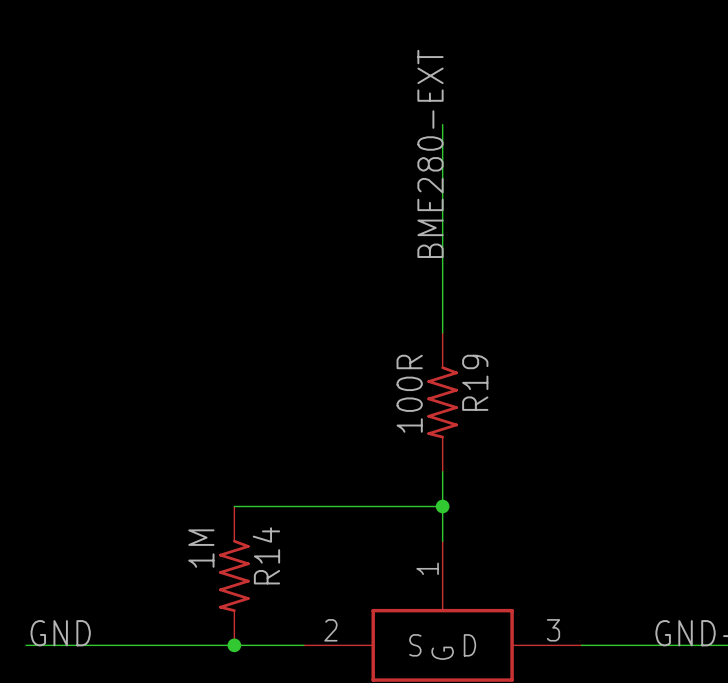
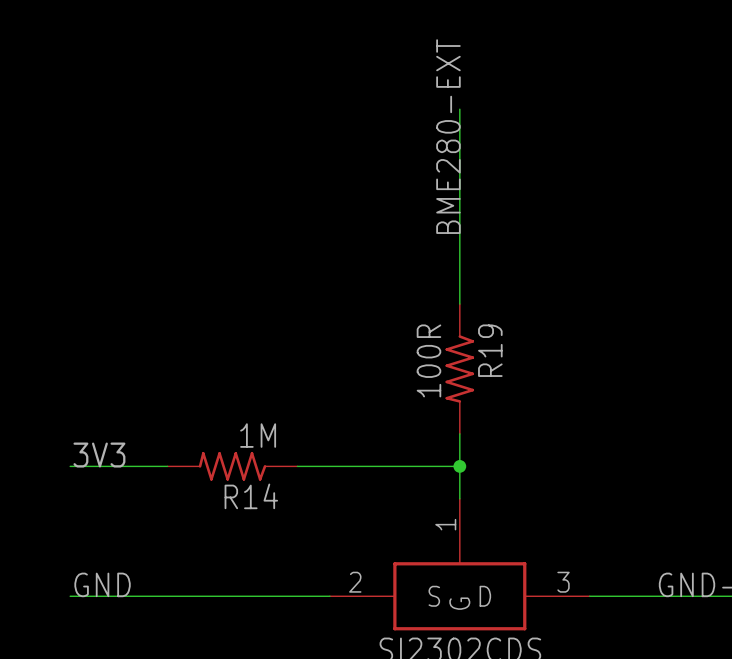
label: none -> 3V3 (99, 455)
wire: none -> (70, 466) (167, 466)
R14 rotation: 0° (234, 575) -> 90° clockwise (232, 466)
junction: (234, 645) -> none

